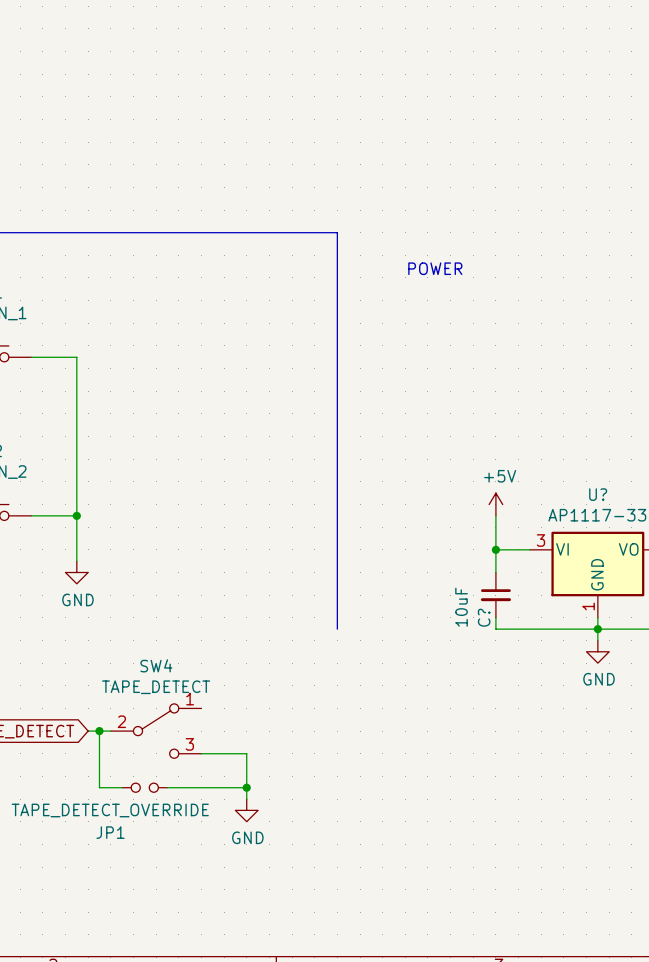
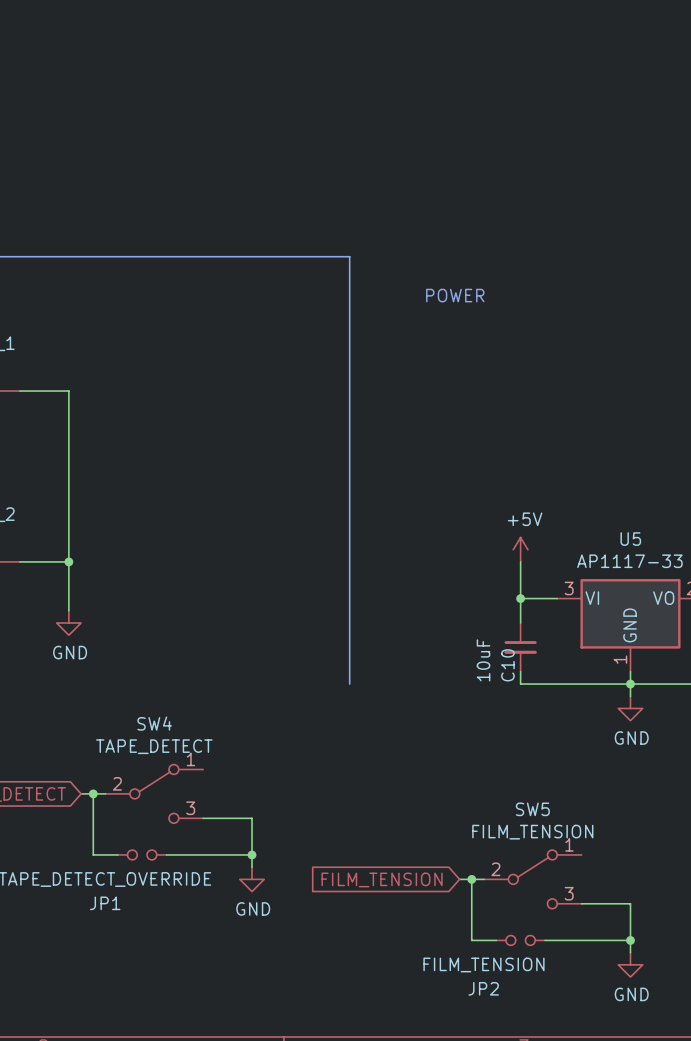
U? name: U? (598, 494) -> U5 (630, 539)
C? name: C? (484, 617) -> C10 (507, 665)
global label: none -> FILM_TENSION (382, 879)
wire: none -> (459, 879) (483, 879)
wire: none -> (471, 879) (471, 940) (496, 940)
junction: none -> (471, 879)
SW5: none -> FILM_TENSION (532, 879)
wire: none -> (581, 903) (630, 903) (630, 952)
JP2: none -> FILM_TENSION (520, 940)
wire: none -> (545, 940) (630, 940)
junction: none -> (630, 940)
power symbol: none -> GND (630, 964)

